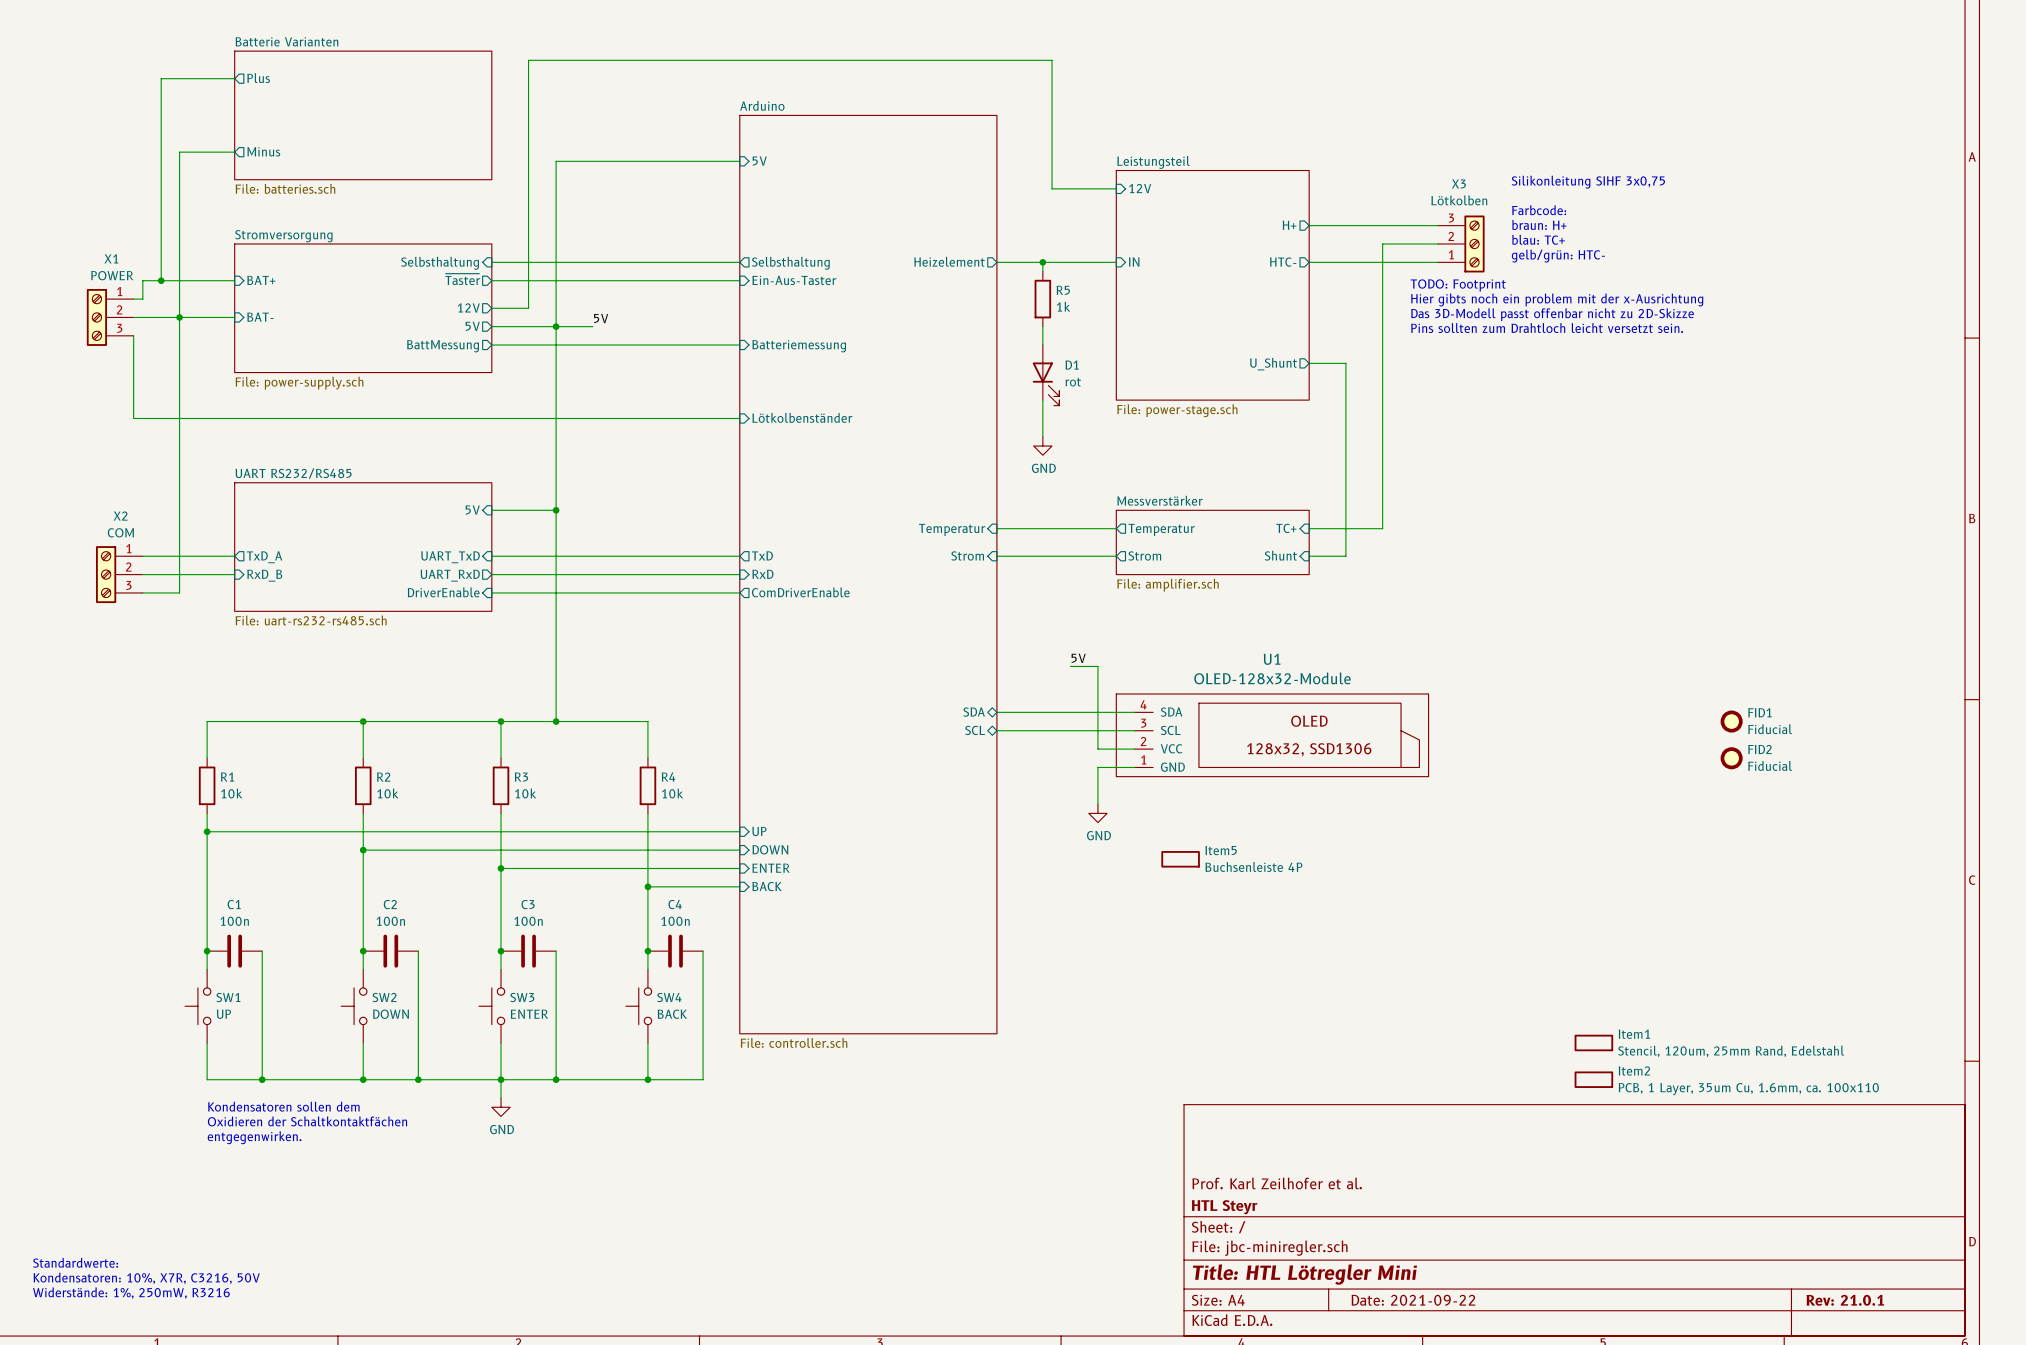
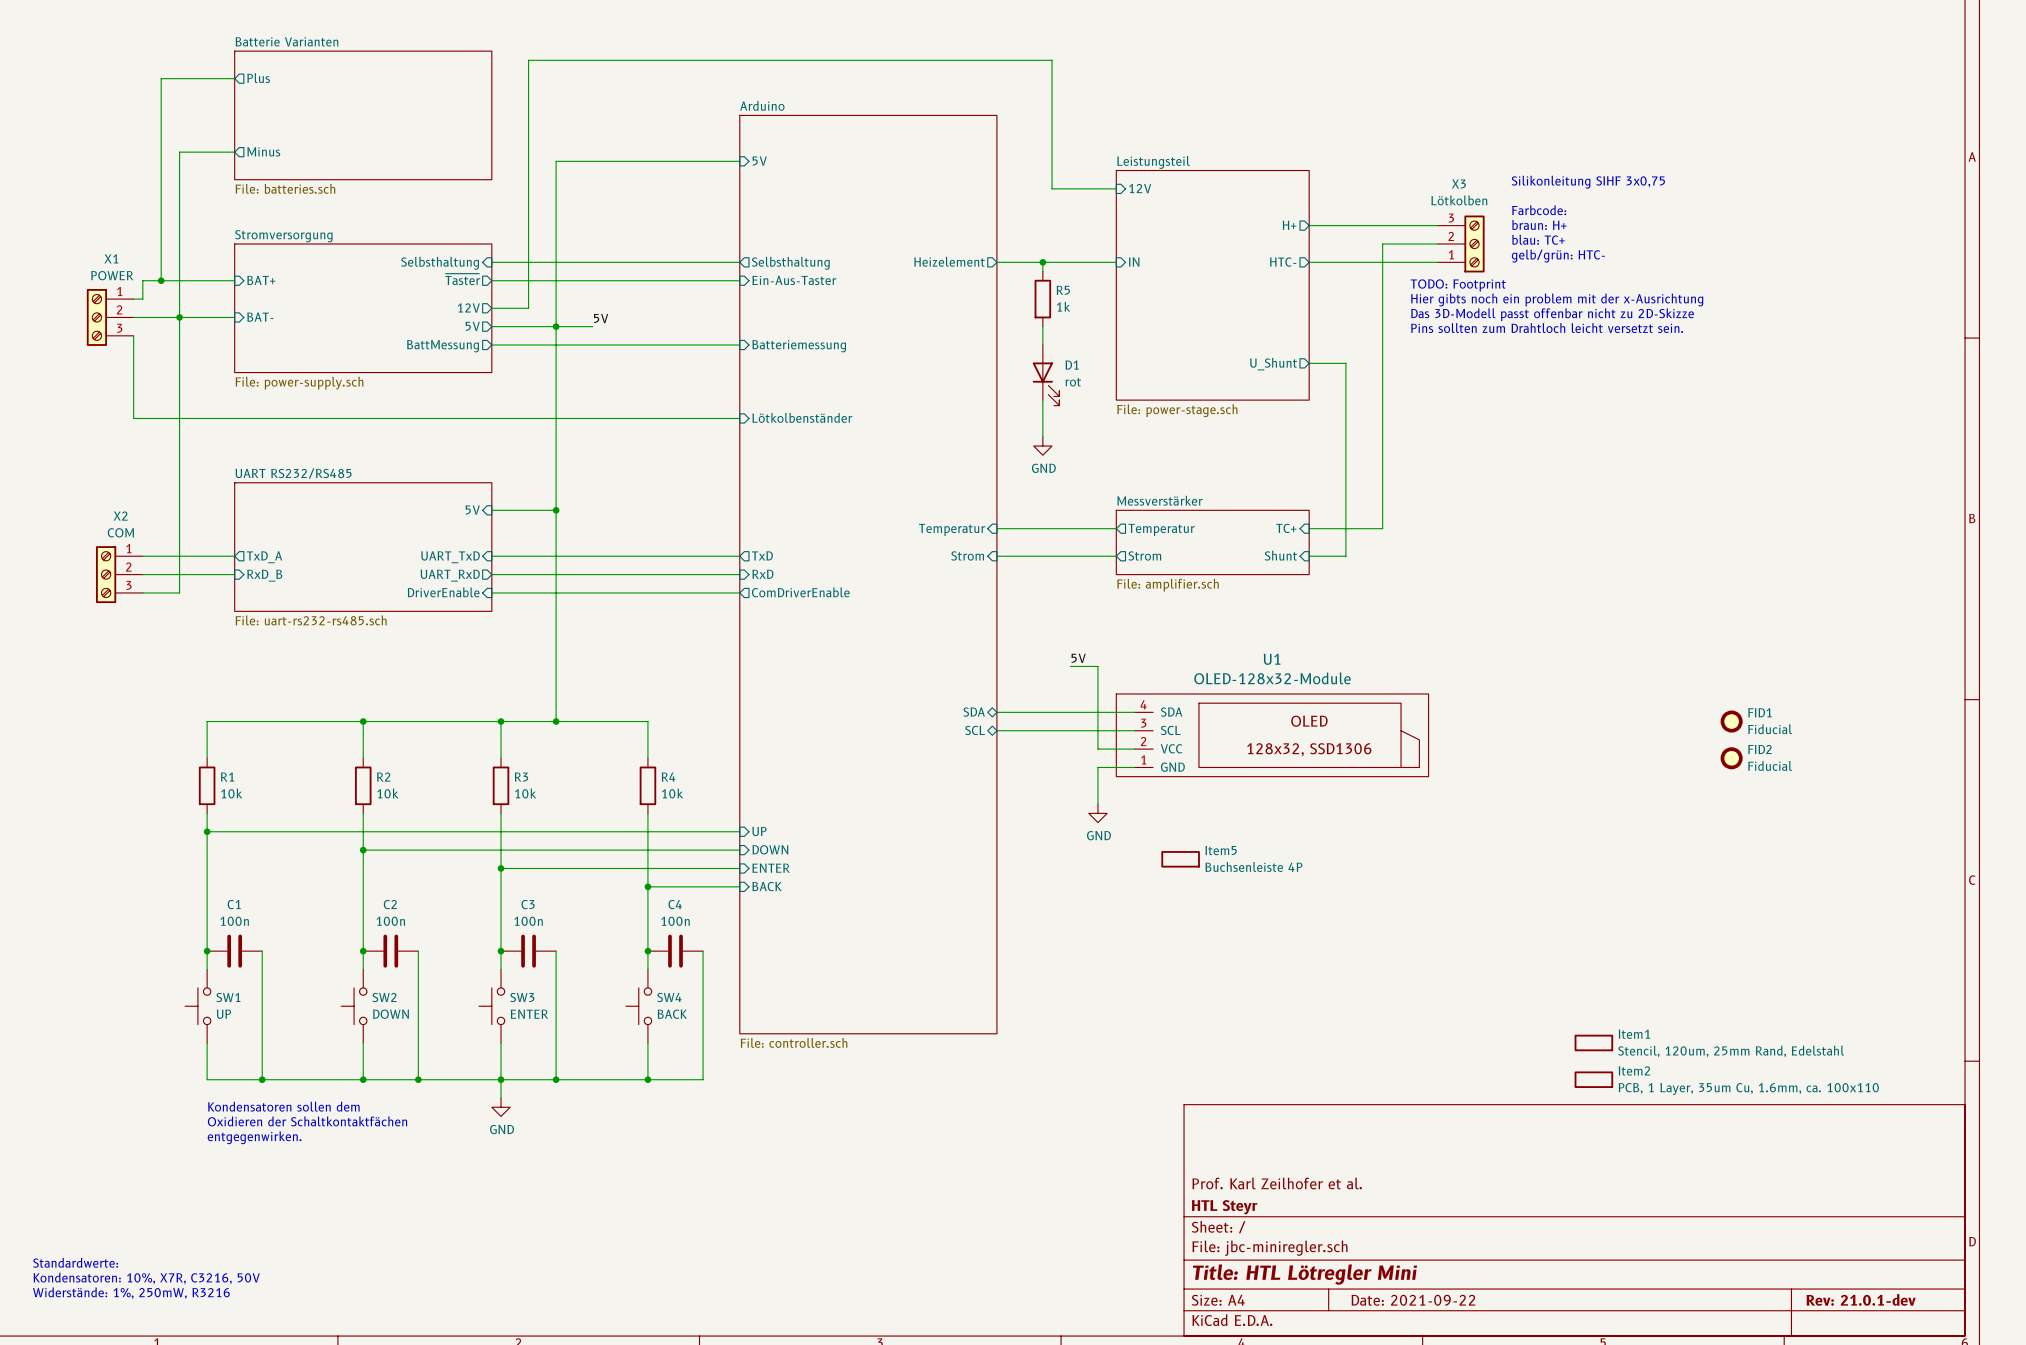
title block: Rev: 21.0.1 (1845, 1300) -> Rev: 21.0.1-dev (1861, 1299)

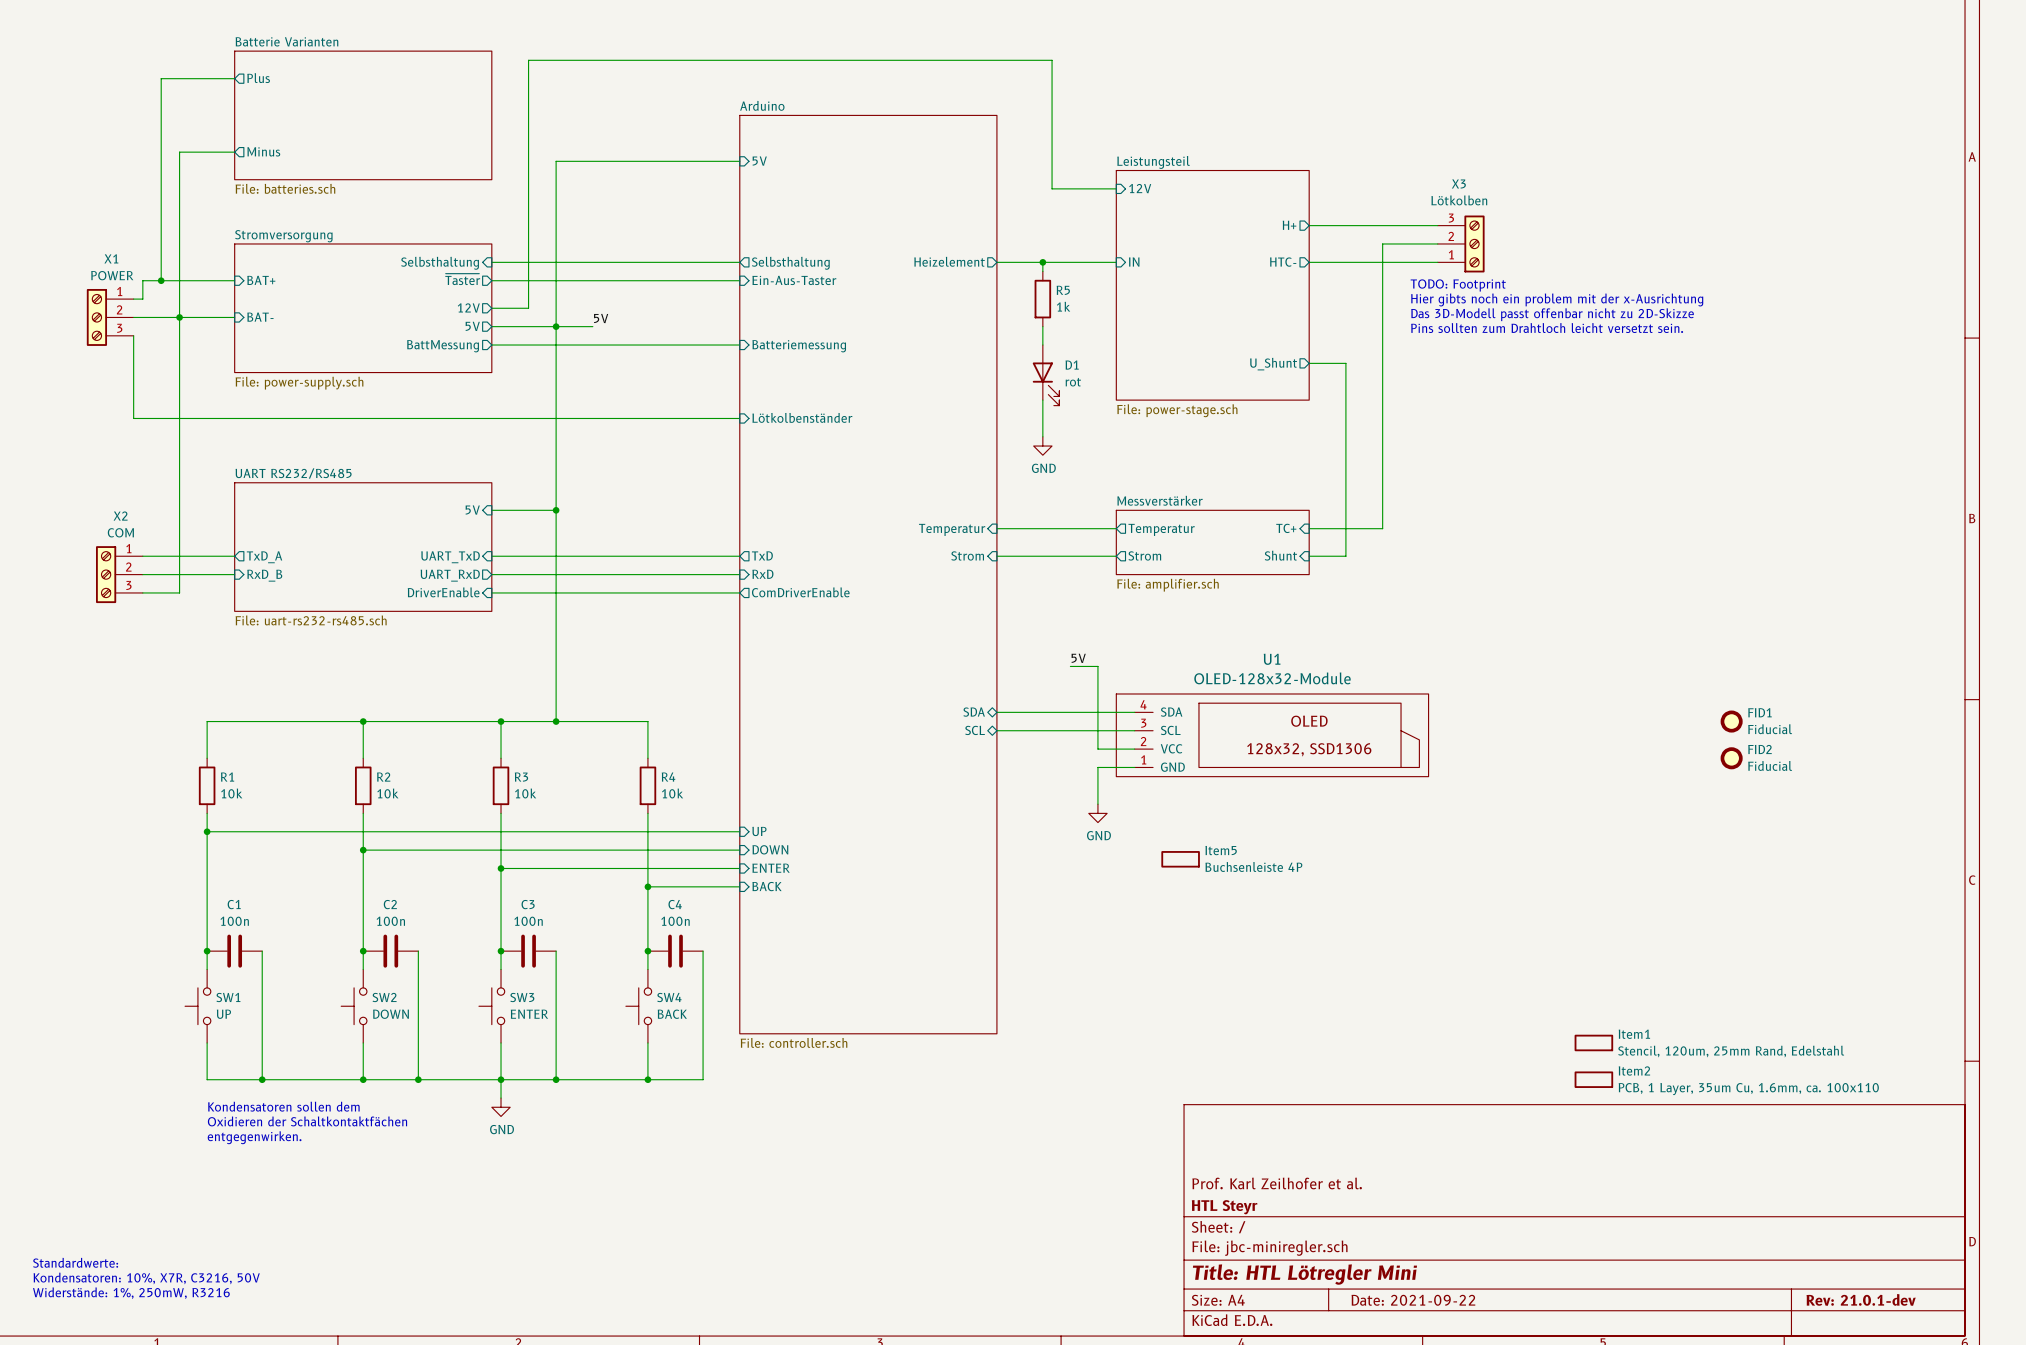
text: Silikonleitung SIHF 3x0,75 (1588, 182) -> none
text: Farbcode: (1539, 210) -> none
text: braun: H+ (1539, 225) -> none
text: blau: TC+ (1538, 239) -> none
text: gelb/grün: HTC- (1558, 256) -> none

